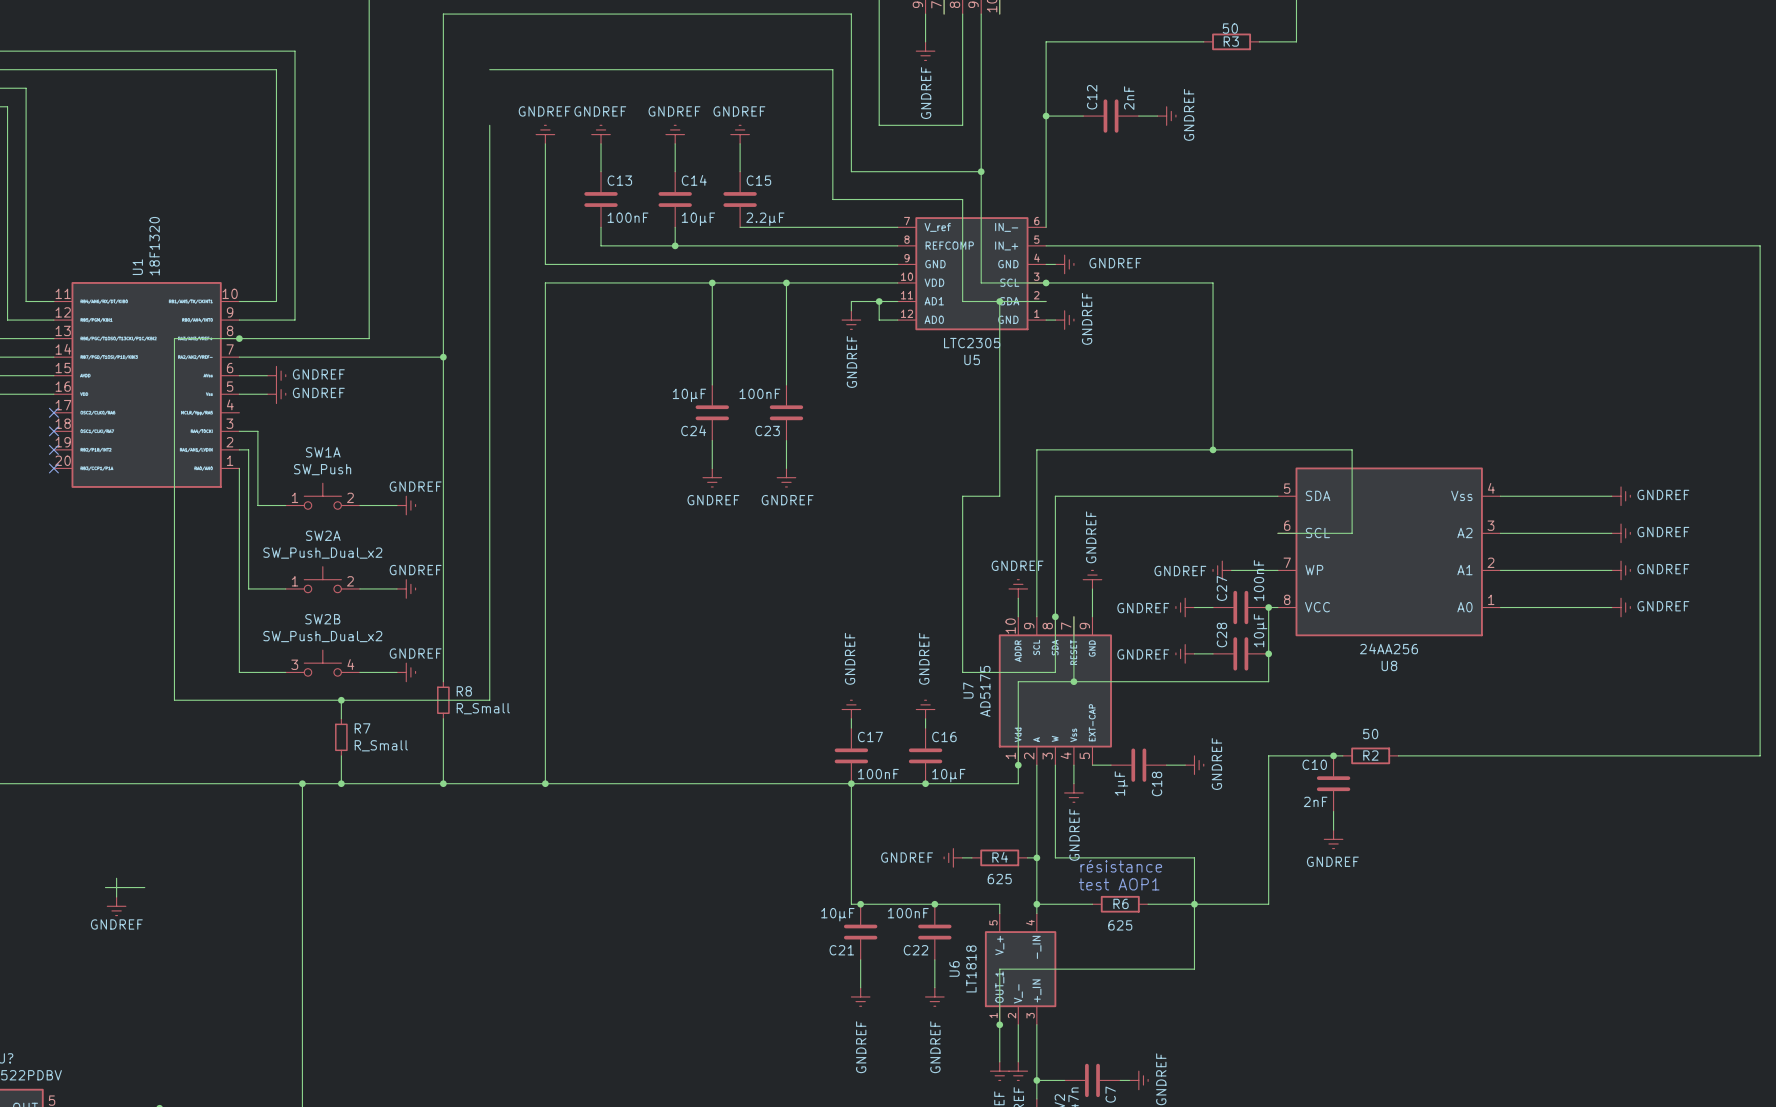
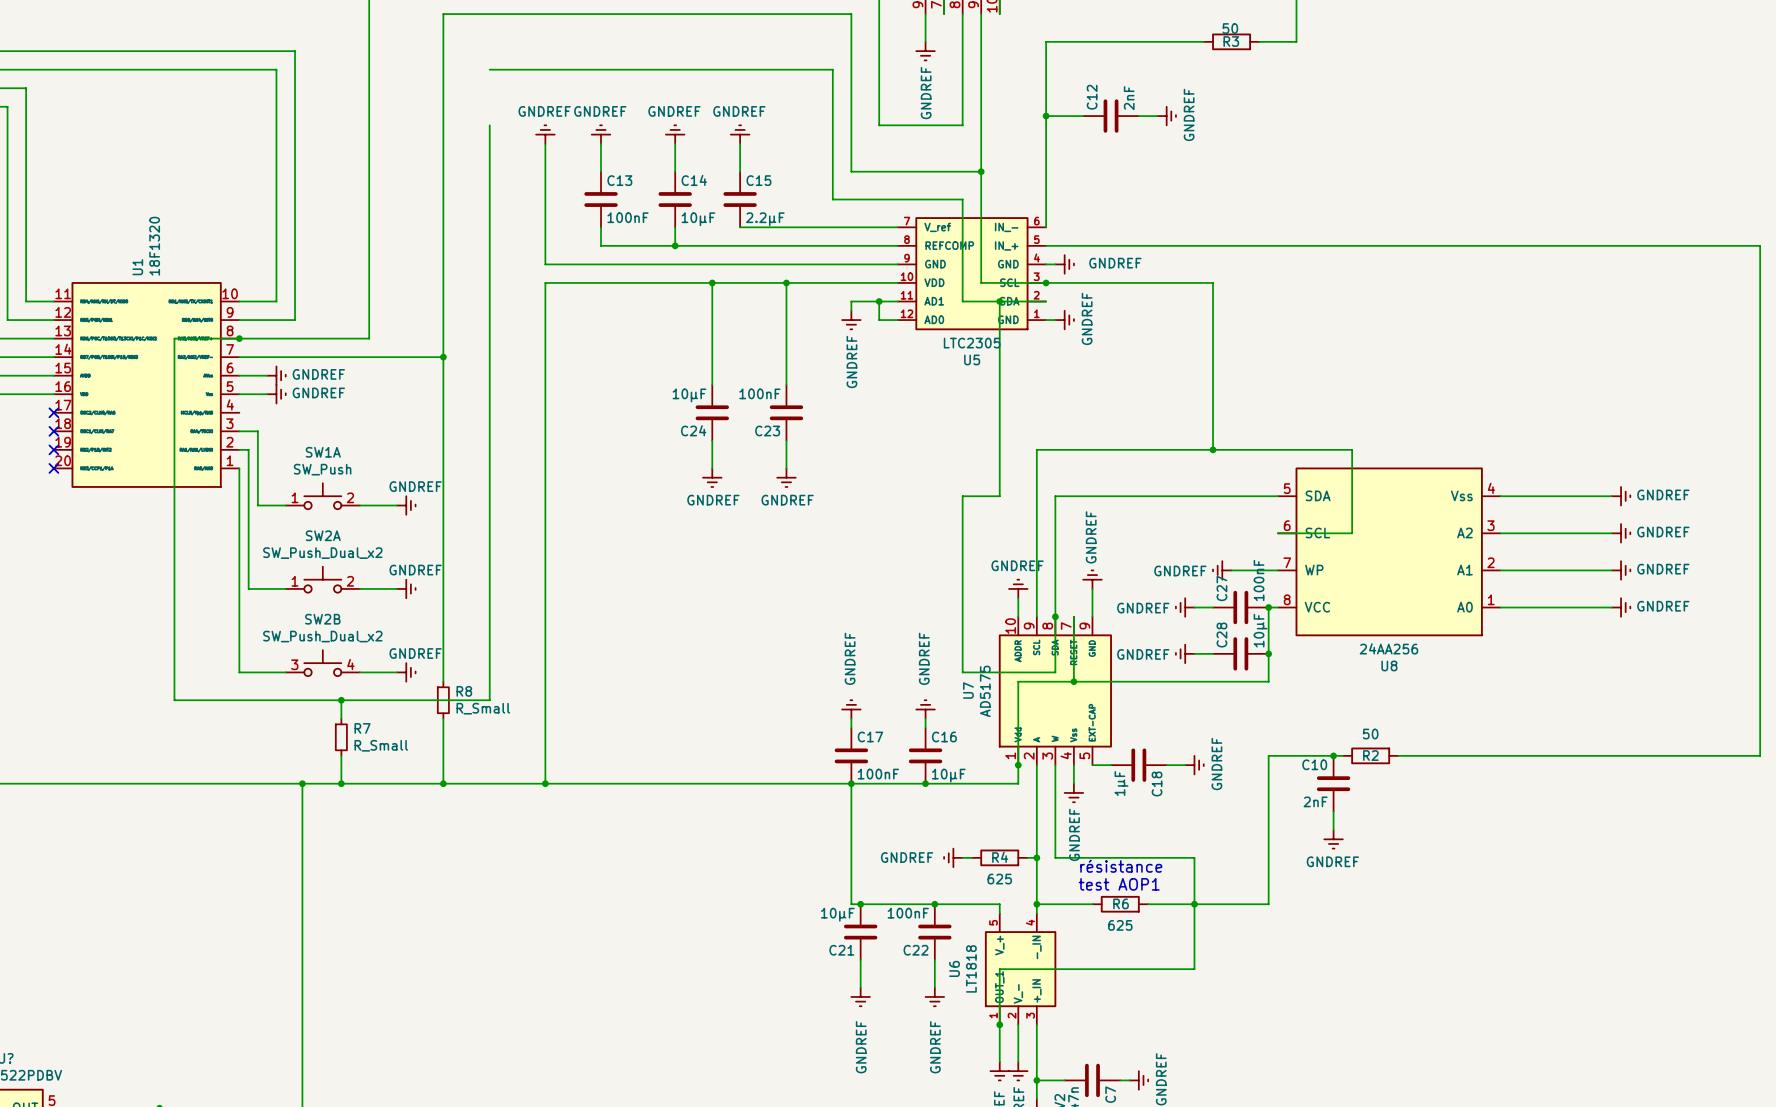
wire: (116, 878) (116, 897) -> none
wire: (105, 887) (144, 887) -> none
power symbol: GNDREF (116, 906) -> none

